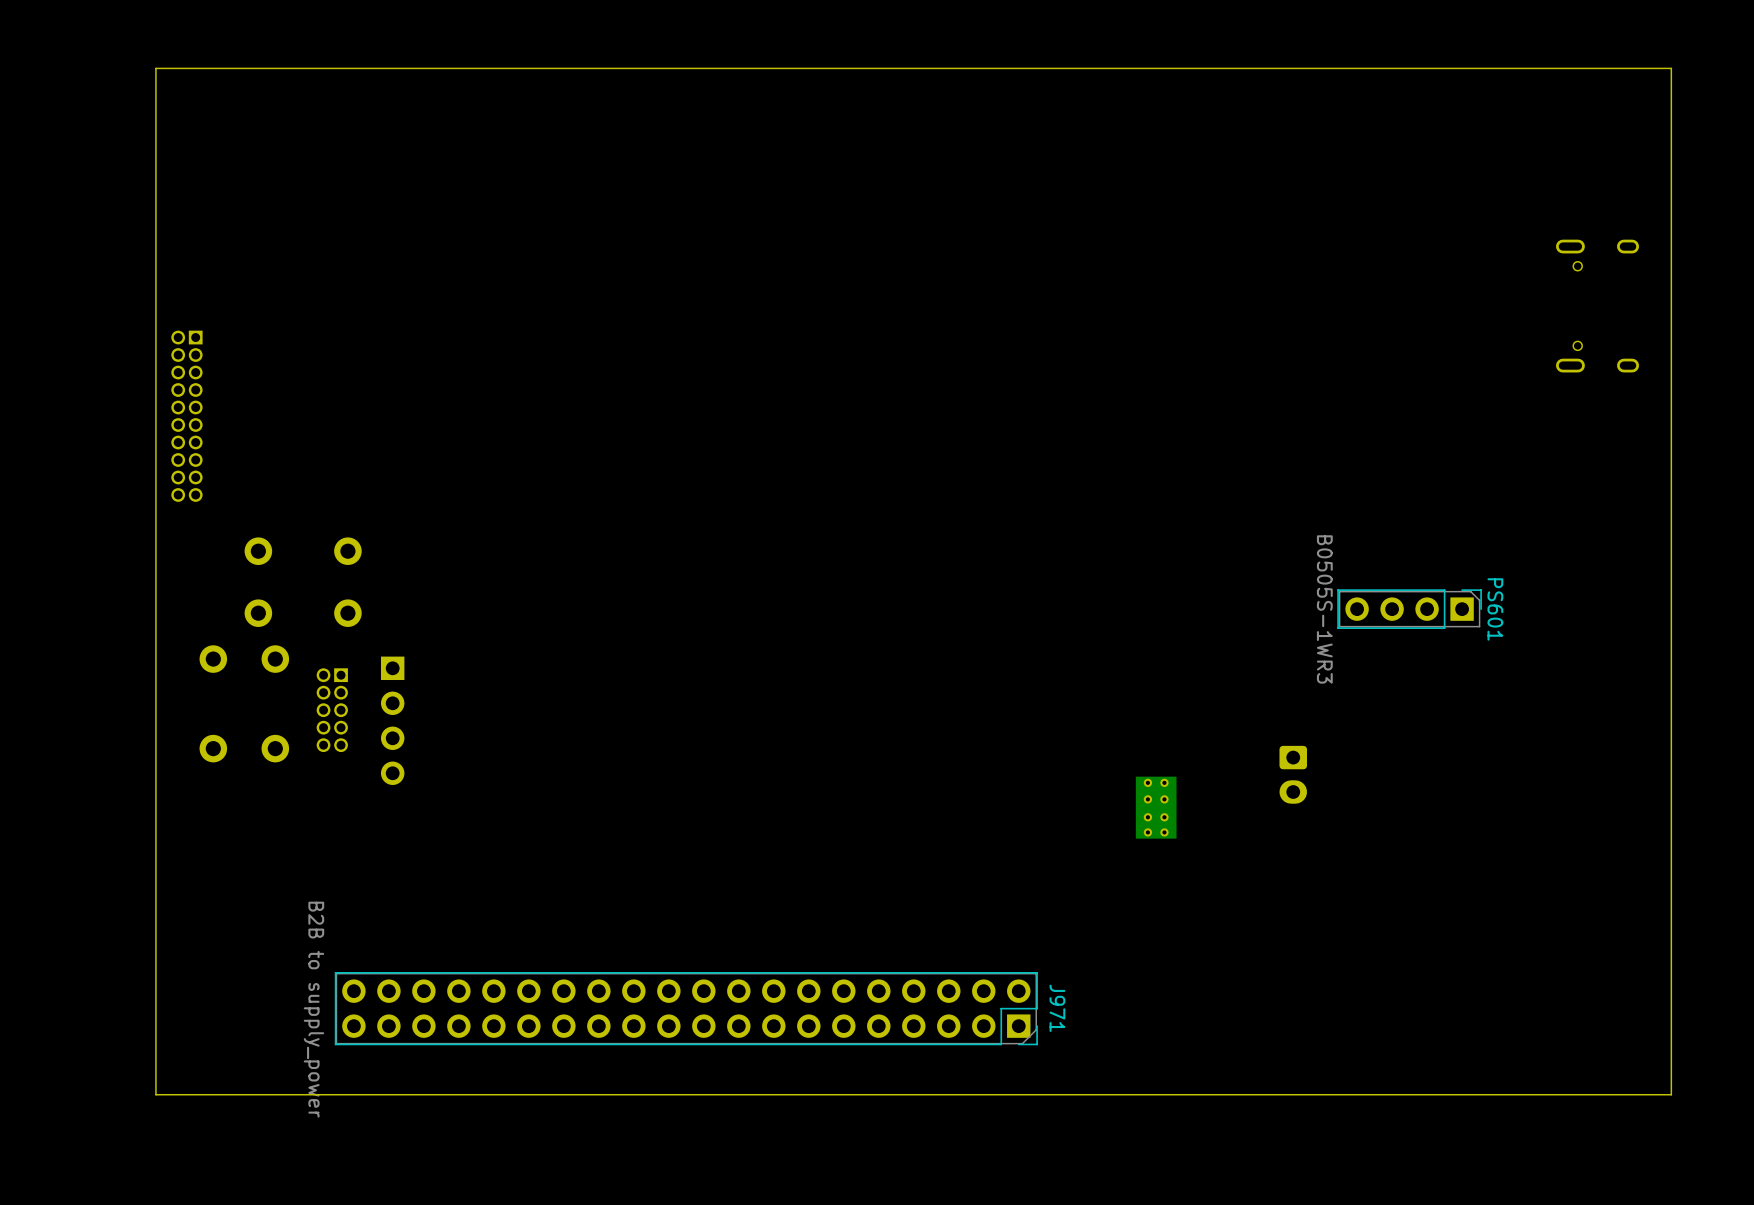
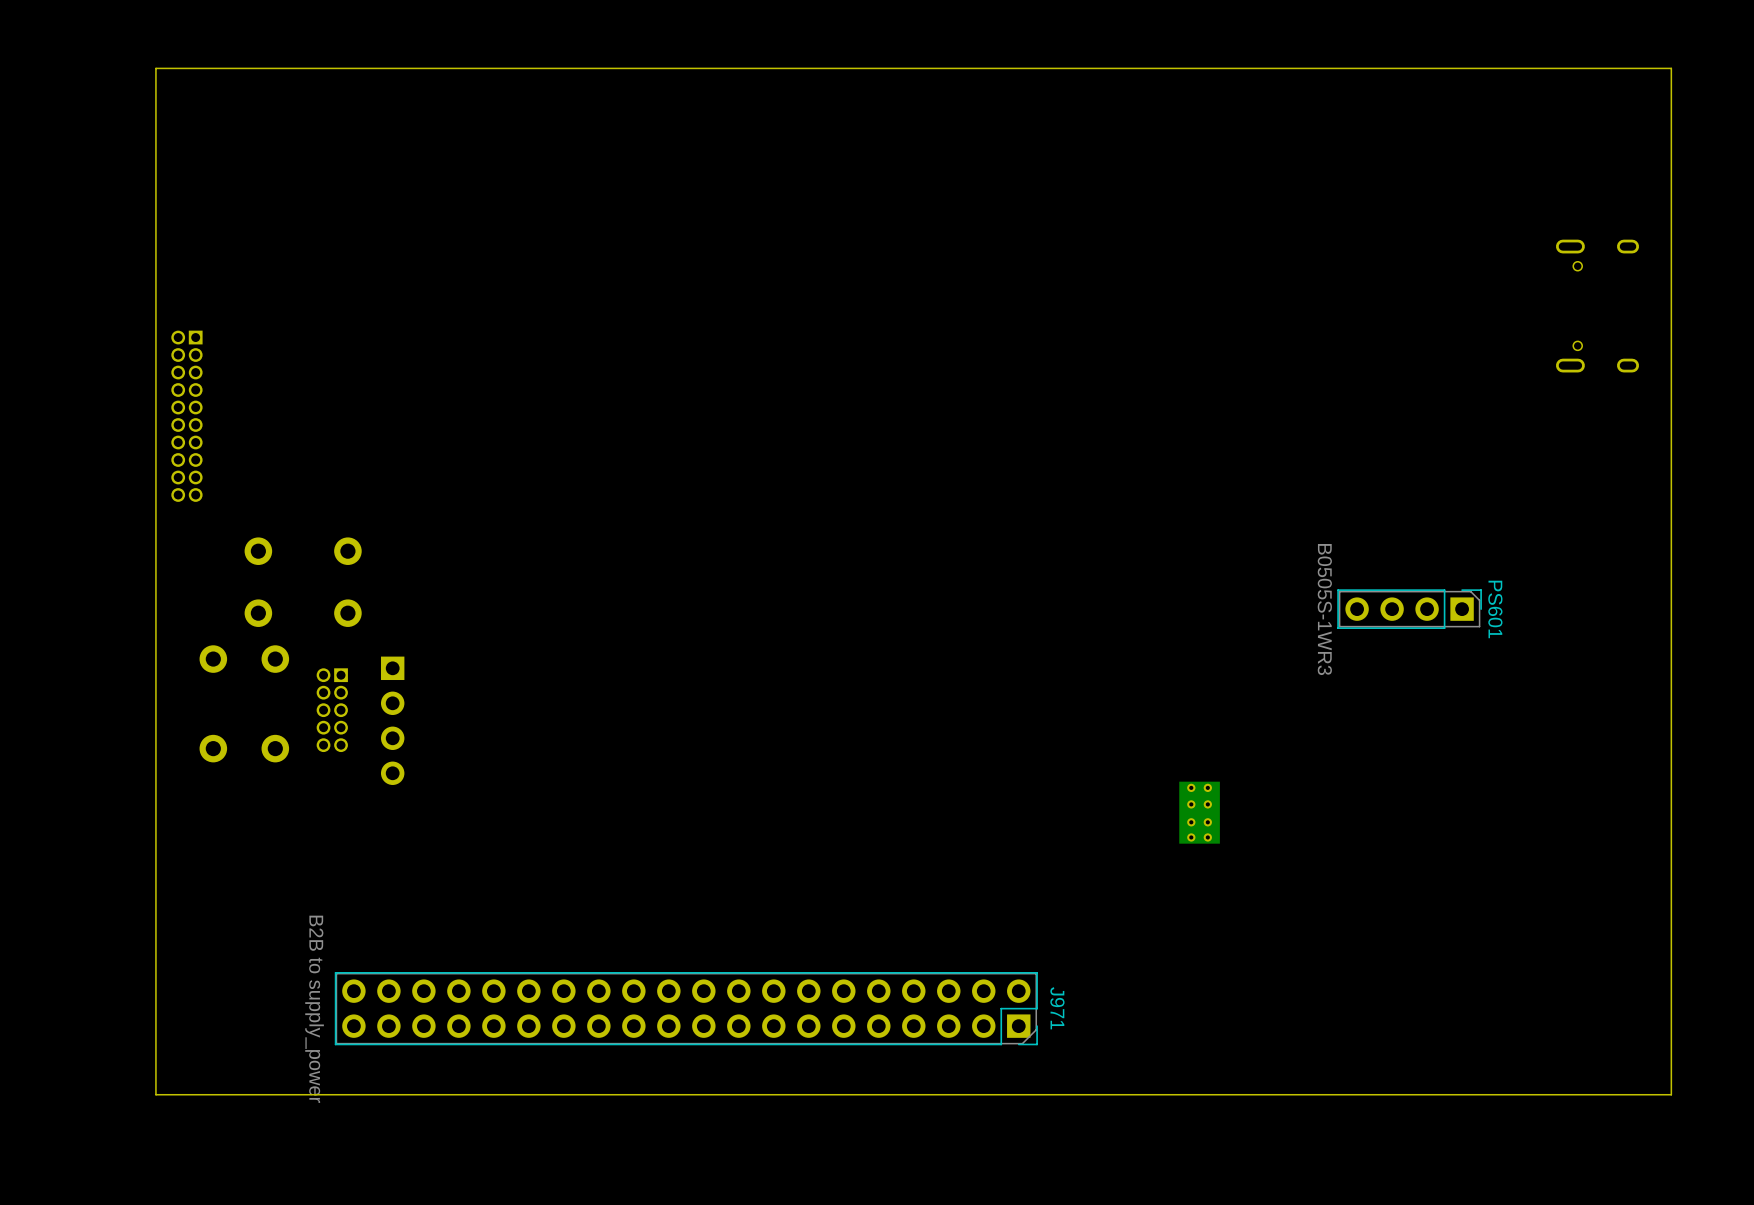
part: (1293, 774) -> none
part position: (1156, 807) -> (1199, 812)

